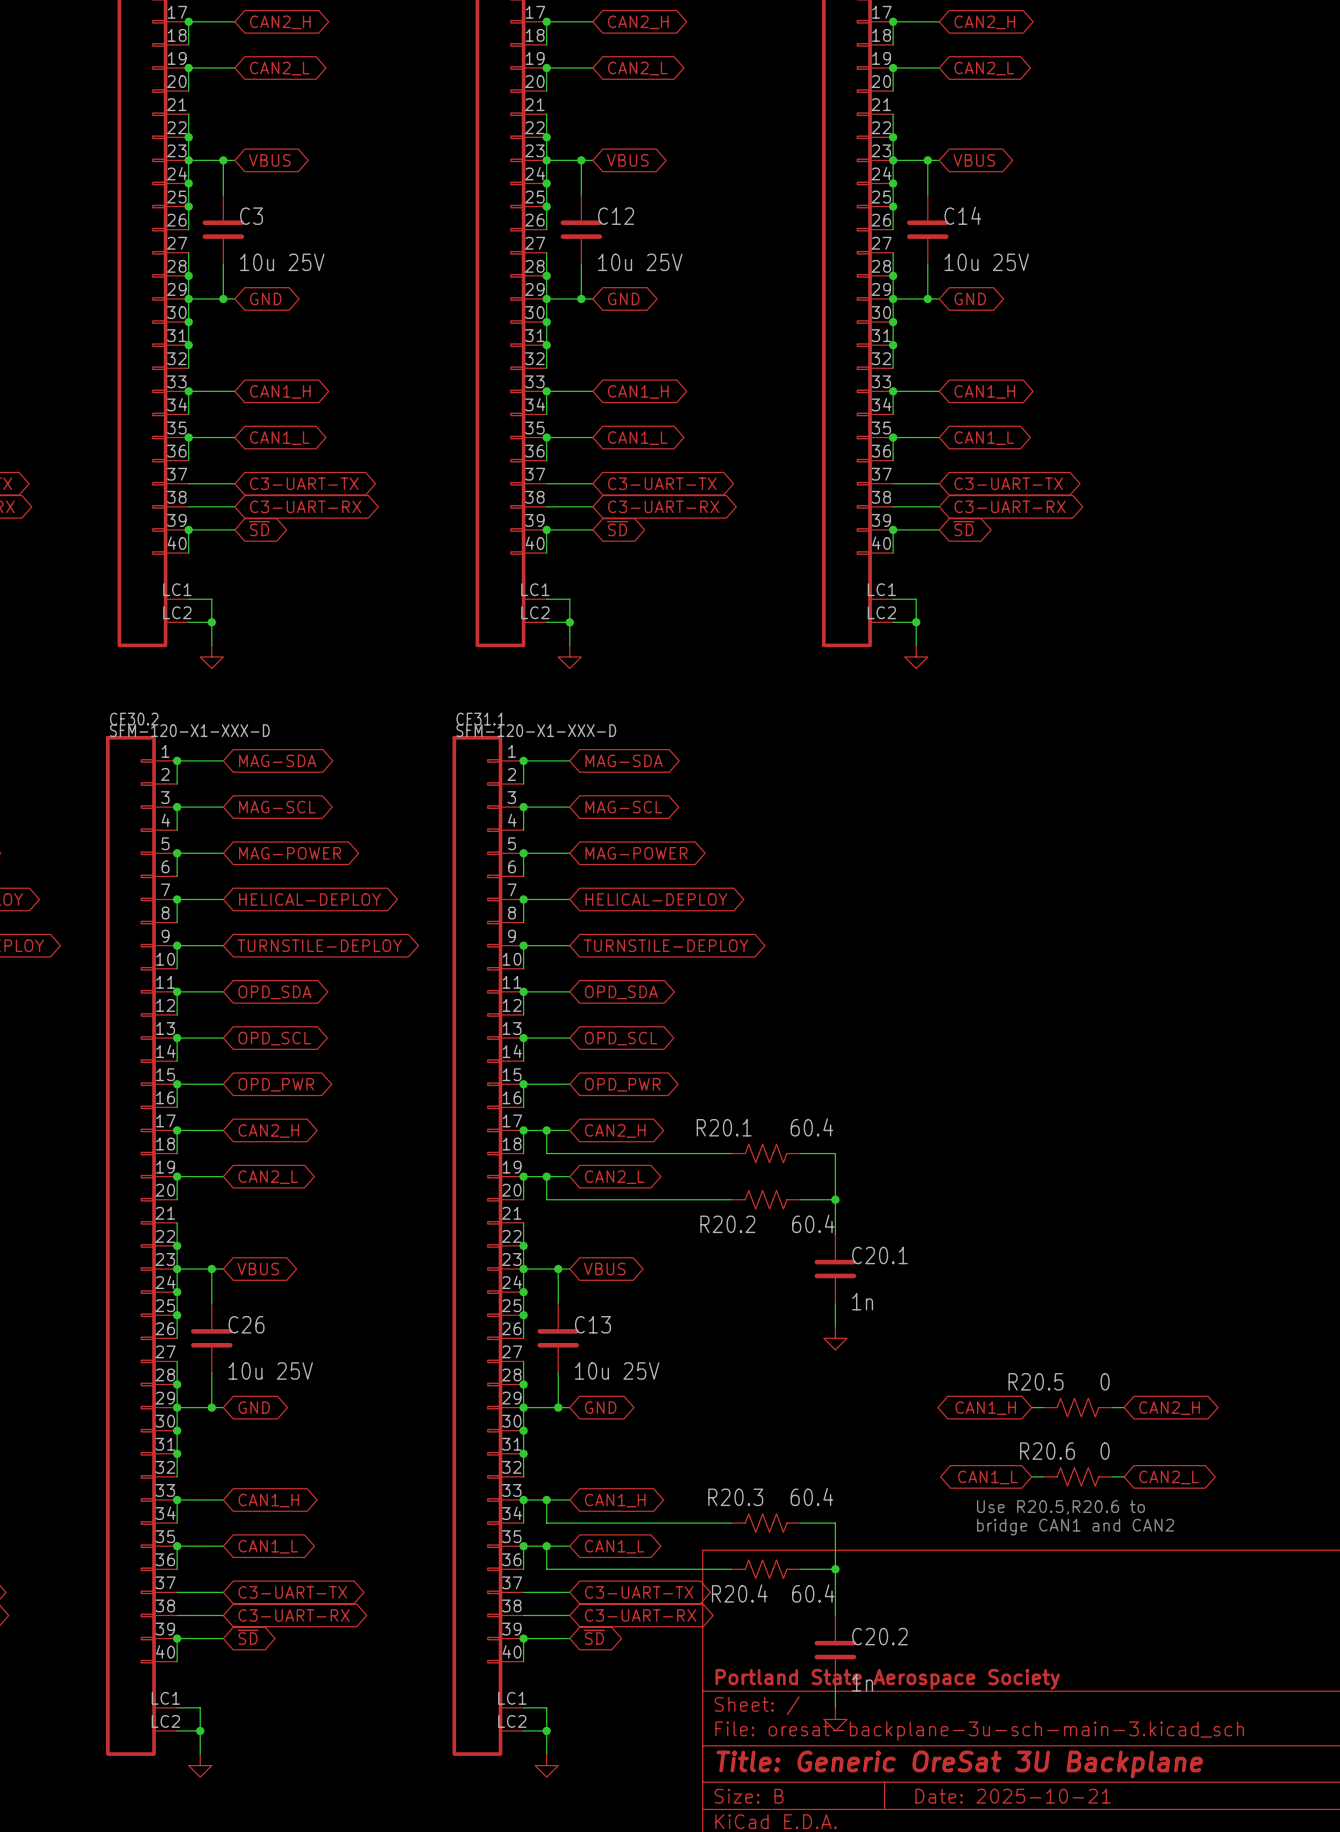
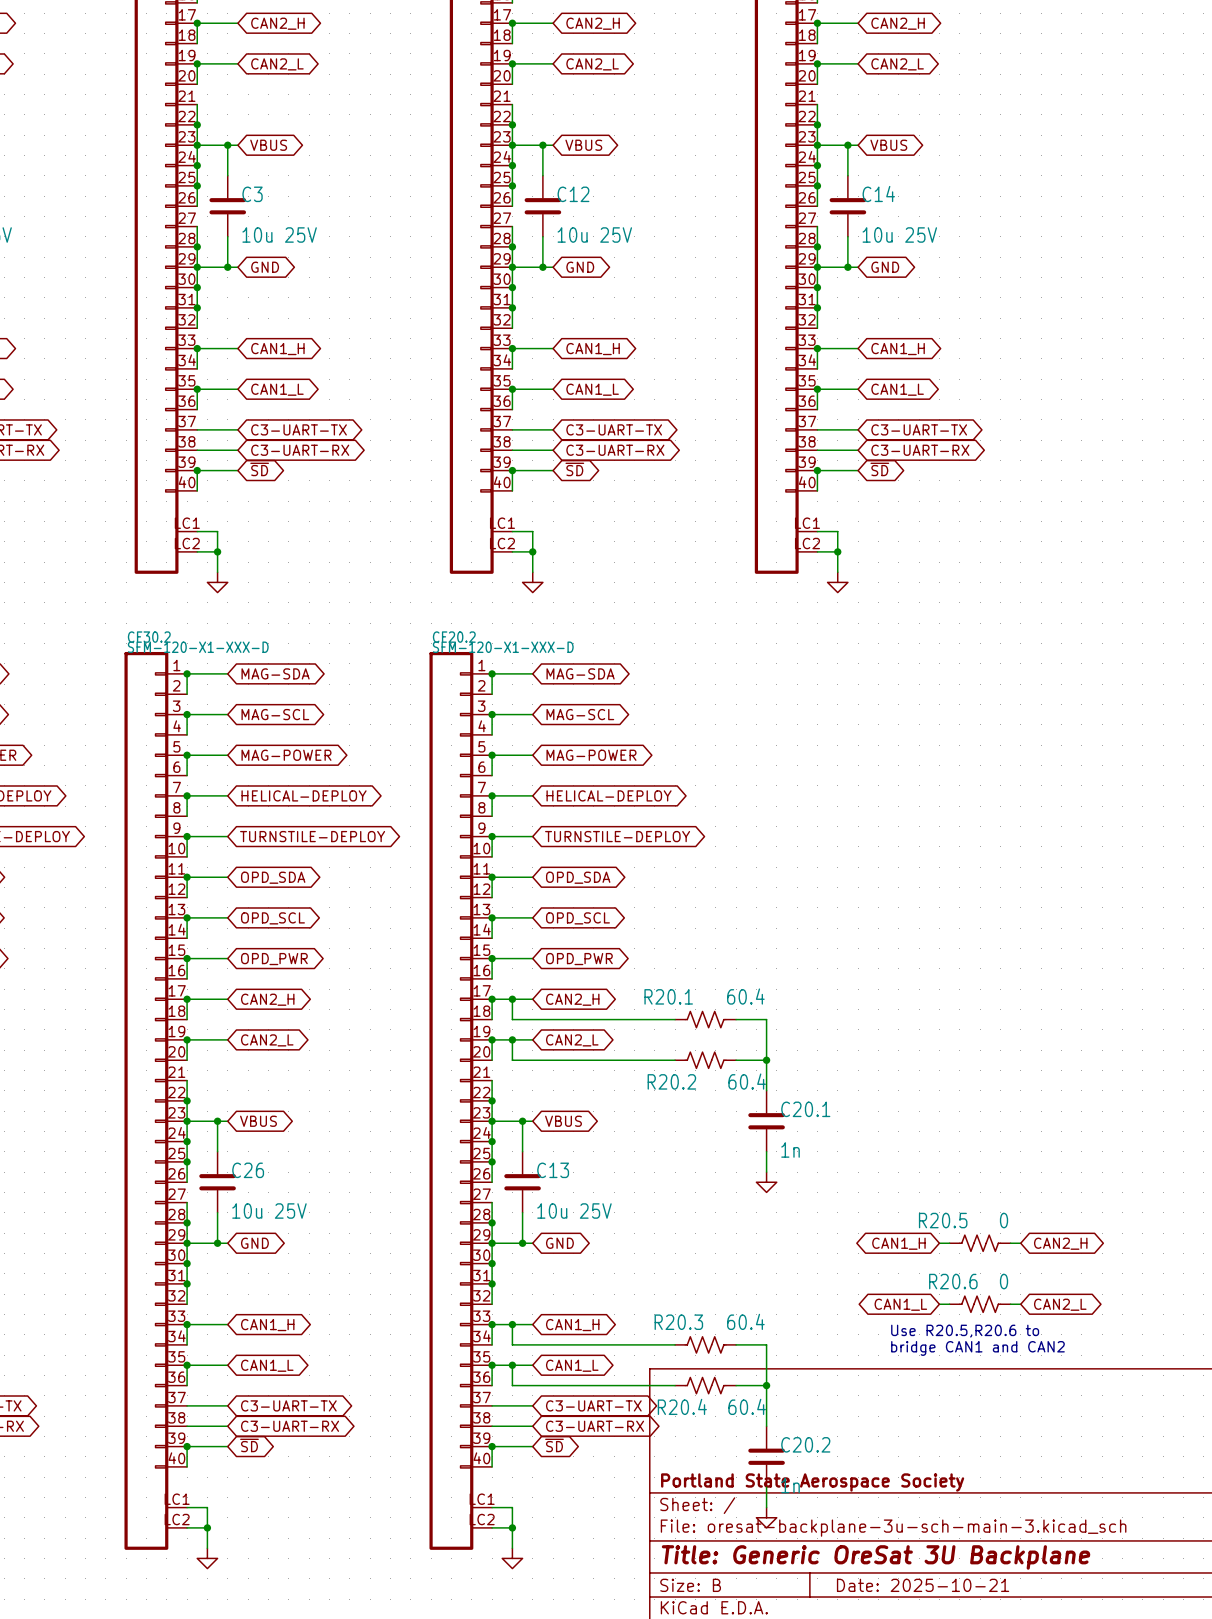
CF31.1 name: CF31.1 (480, 719) -> CF20.2 (454, 637)

